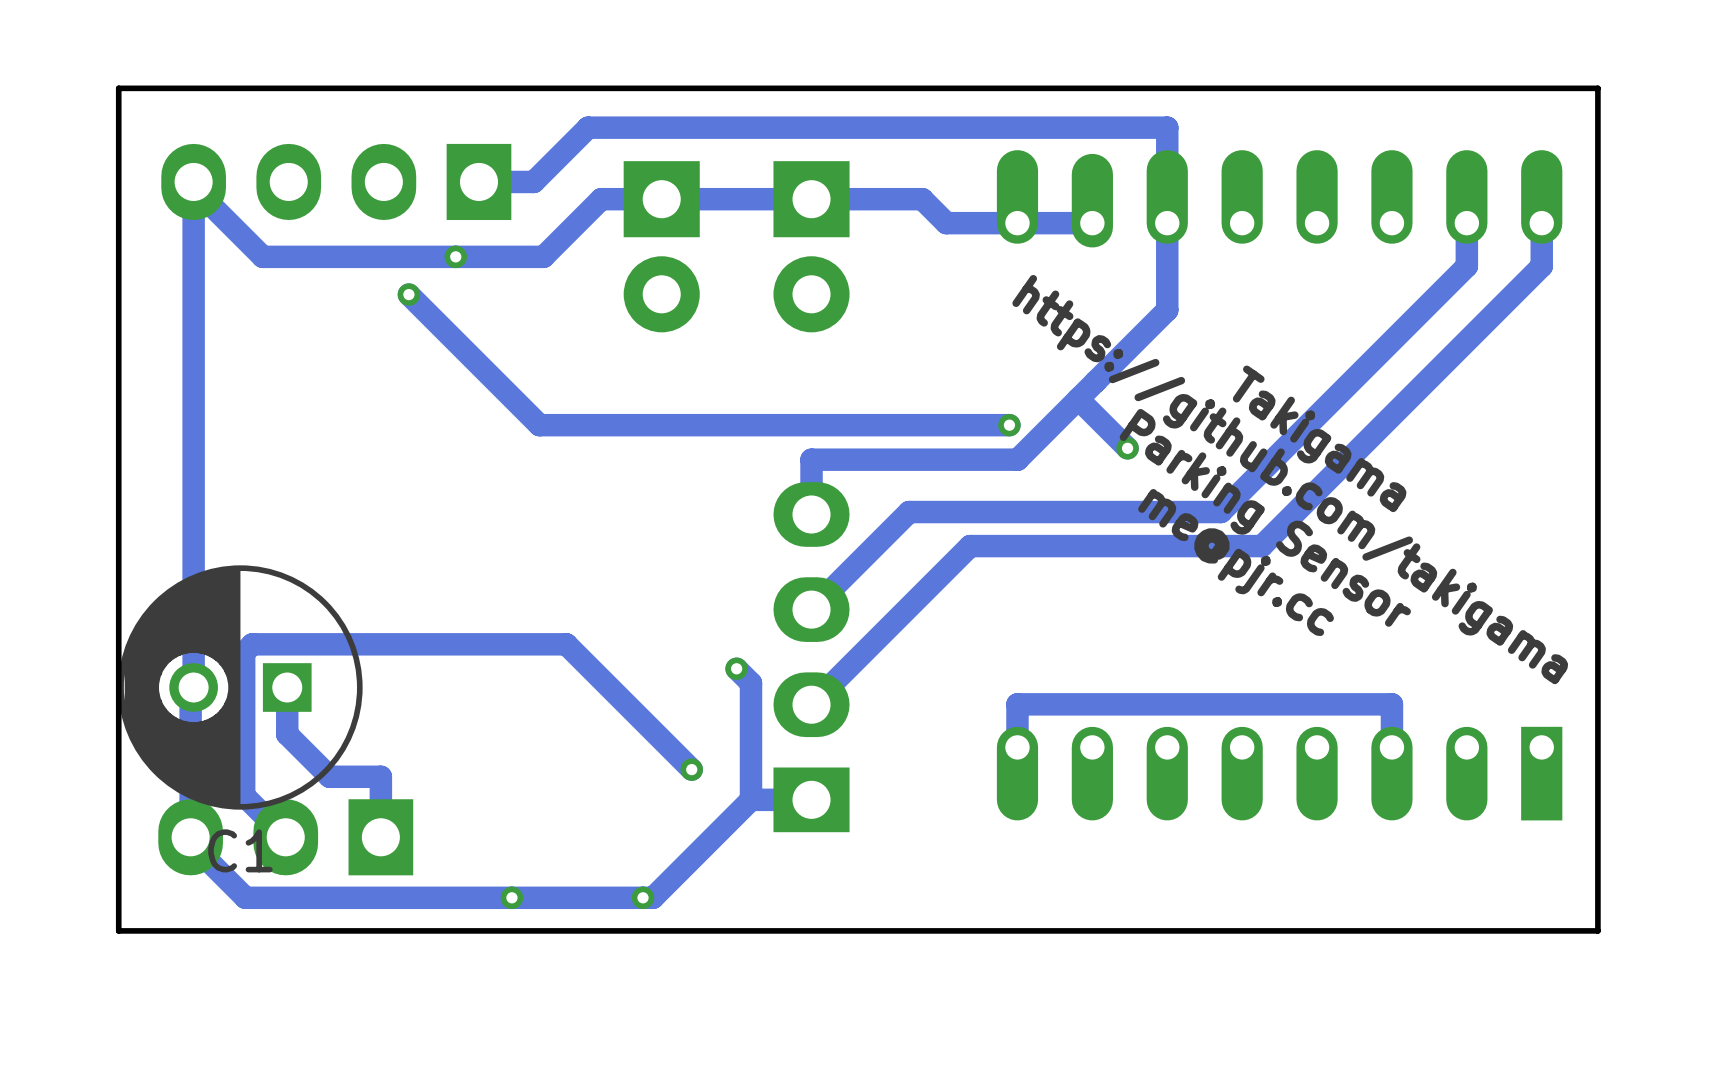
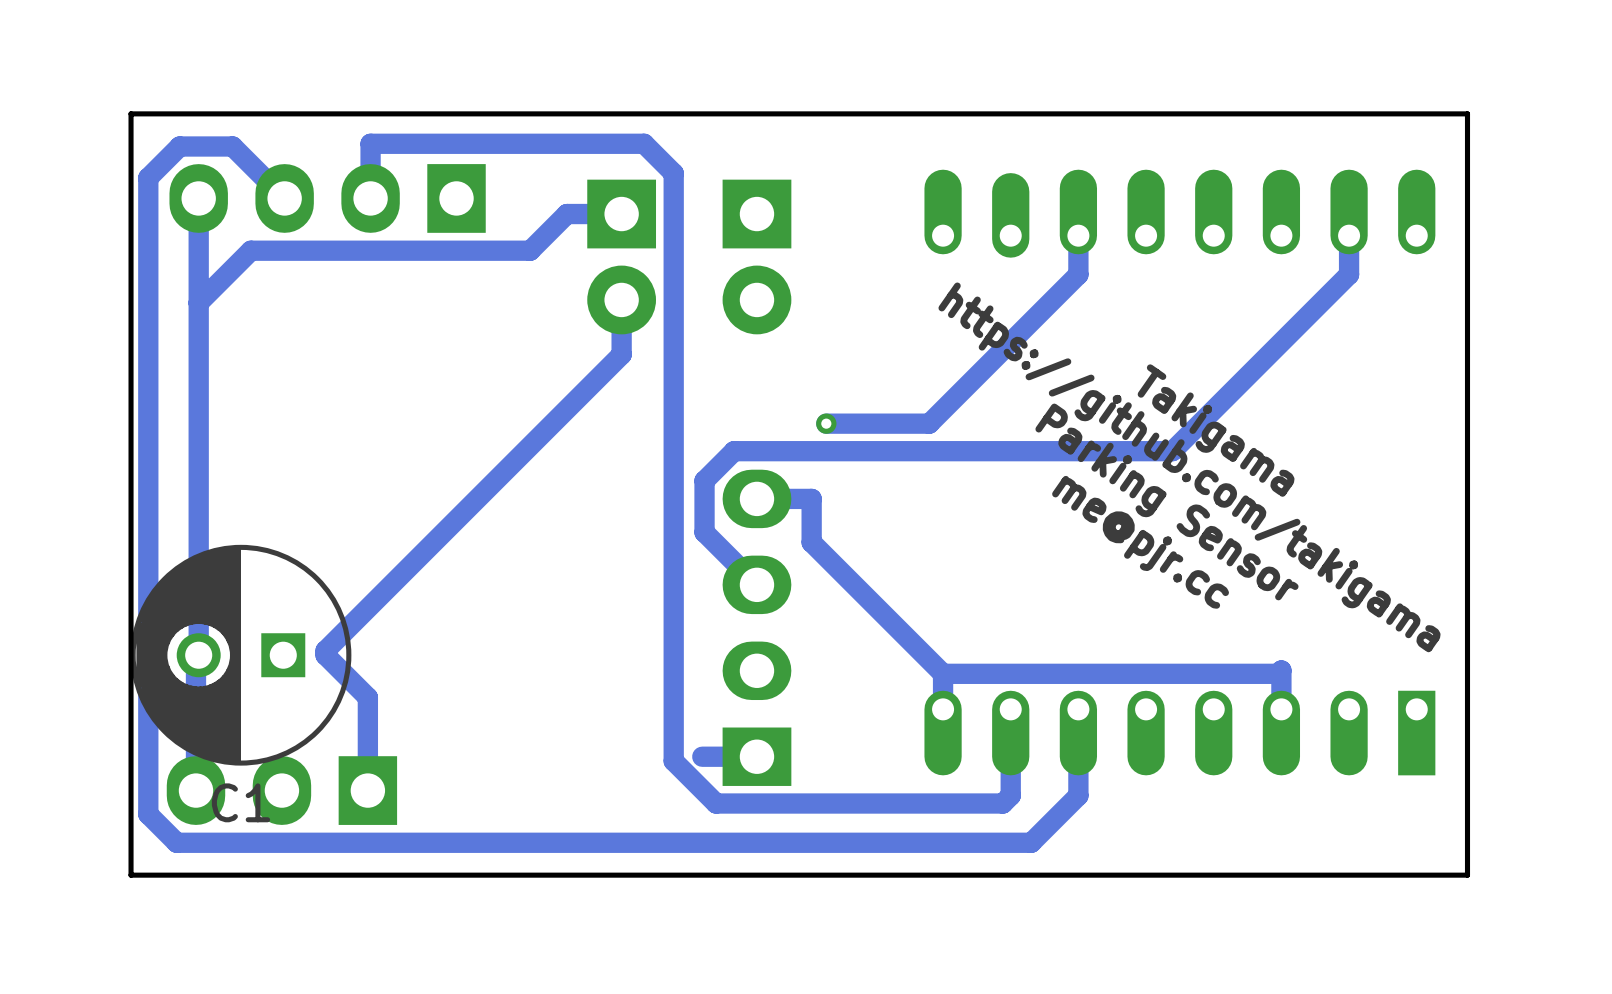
track: none -> (284, 198) (232, 146) (179, 146) (148, 177) (148, 814) (176, 842) (1031, 842) (1078, 795) (1078, 709)
track: none -> (370, 198) (370, 143) (644, 143) (673, 173) (673, 761) (716, 803) (1002, 803) (1010, 795) (1010, 709)
track: (478, 181) (533, 181) (588, 127) (1167, 127) (1167, 223) -> none
track: (193, 187) (262, 256) (543, 256) (560, 239) -> (198, 302) (250, 250) (530, 250)
track: (661, 199) (922, 199) (946, 223) (1092, 223) -> none
track: (1541, 223) (1541, 266) (1261, 546) (970, 546) (811, 704) -> none
via: (455, 256) -> none
track: (1167, 266) (1167, 310) (1078, 399) -> (1078, 274) (929, 423) (826, 423)
track: (408, 294) (539, 425) (1009, 425) -> none
via: (408, 294) -> none
track: (1078, 399) (1127, 448) -> none
track: (1078, 399) (1017, 459) (811, 459) (811, 514) -> none
via: (1009, 425) -> none
via: none -> (826, 423)
via: (1127, 448) -> none
track: (1271, 461) (1221, 512) (909, 512) (811, 609) -> (1172, 451) (734, 451) (704, 480) (704, 532) (756, 584)
track: (736, 668) (751, 683) (751, 799) (653, 897) (245, 897) (190, 842) (190, 837) -> none
via: (736, 668) -> none
track: (287, 687) (287, 734) (329, 776) (380, 776) -> (621, 299) (621, 354) (325, 650) (325, 655) (367, 697) (367, 735)
track: (1391, 704) (1017, 704) (1017, 708) -> (1281, 670) (1278, 673) (943, 673) (811, 542) (811, 498) (756, 498)
track: (691, 769) (566, 644) (252, 644) (244, 652) (244, 795) (285, 837) -> none
via: (691, 769) -> none
via: (511, 897) -> none
via: (643, 897) -> none

